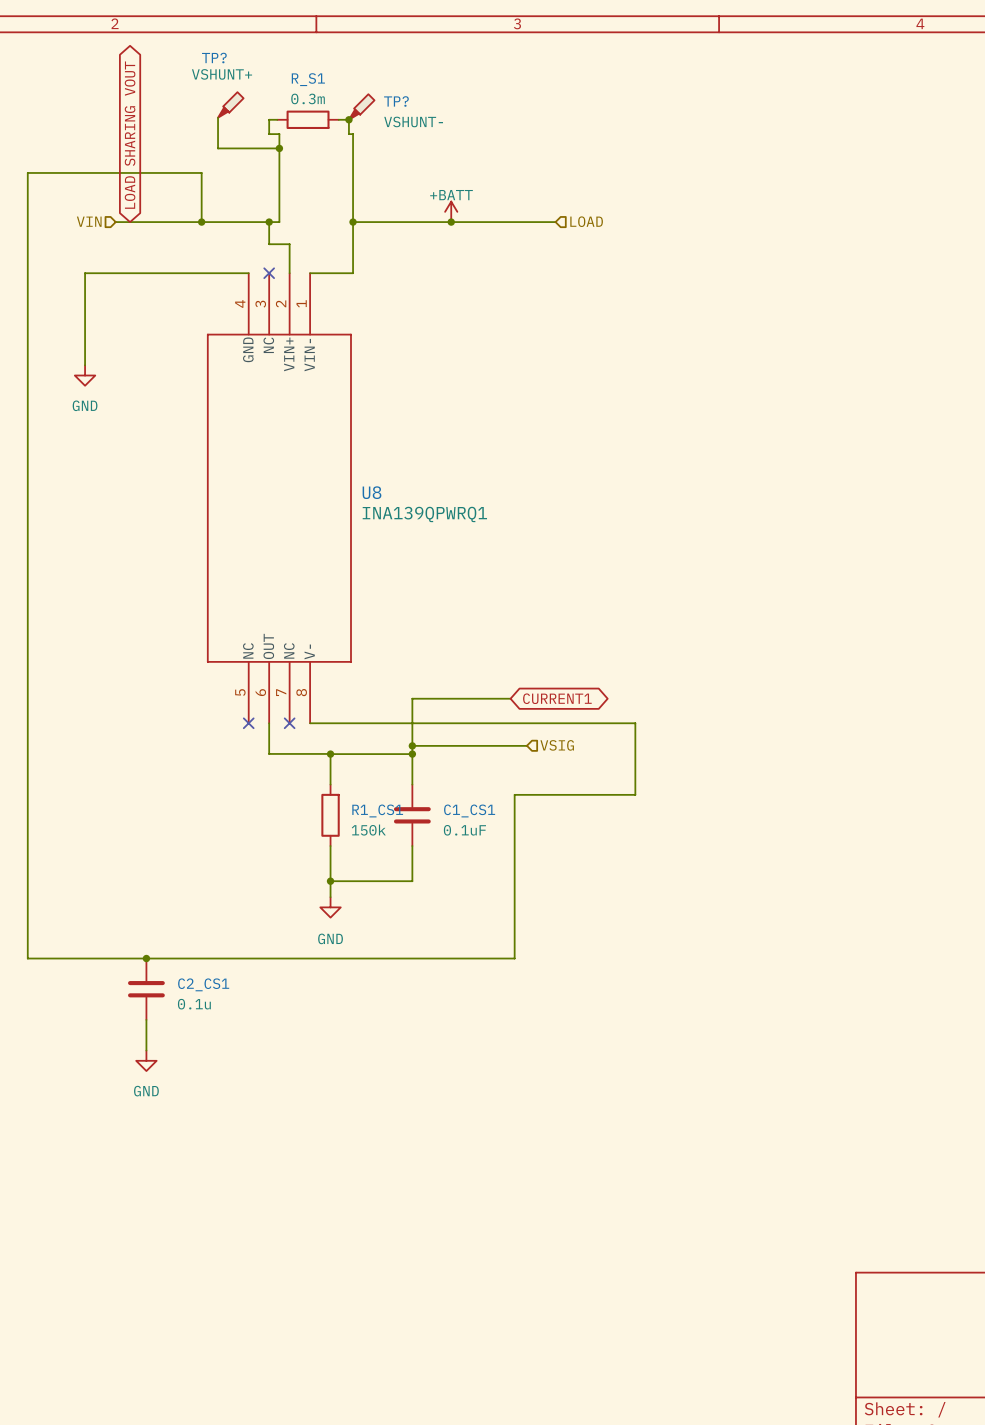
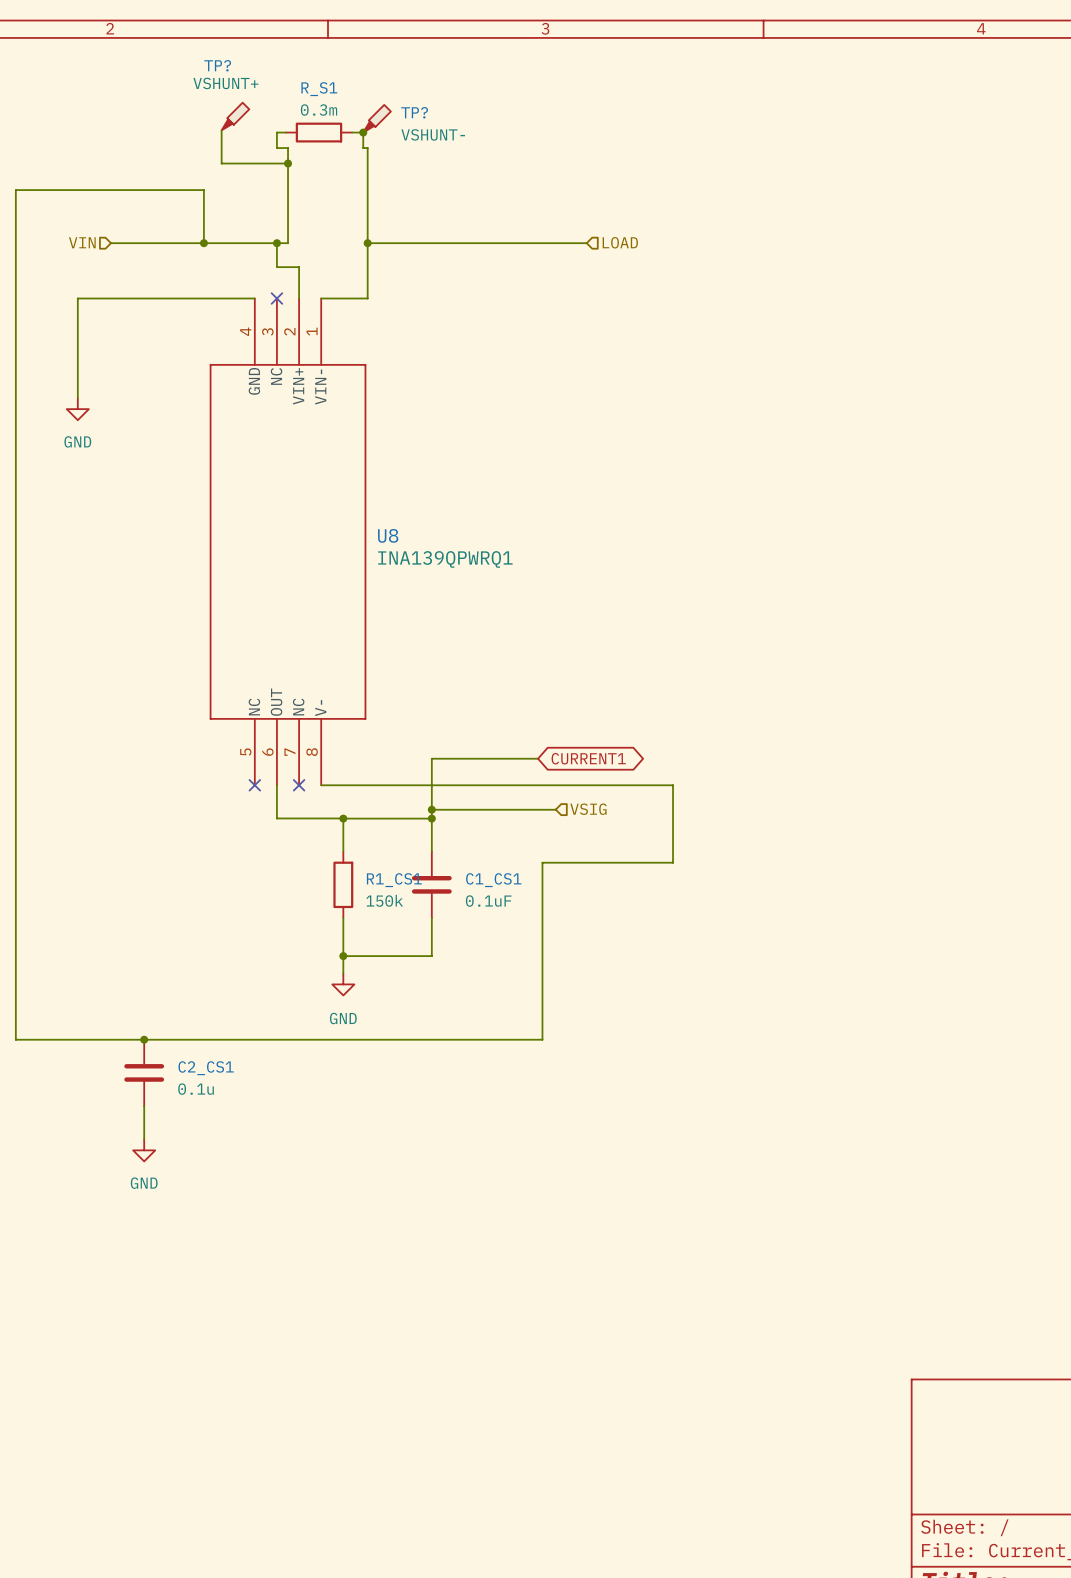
global label: LOAD SHARING VOUT (130, 135) -> none
power symbol: +BATT (451, 211) -> none
junction: (451, 222) -> none

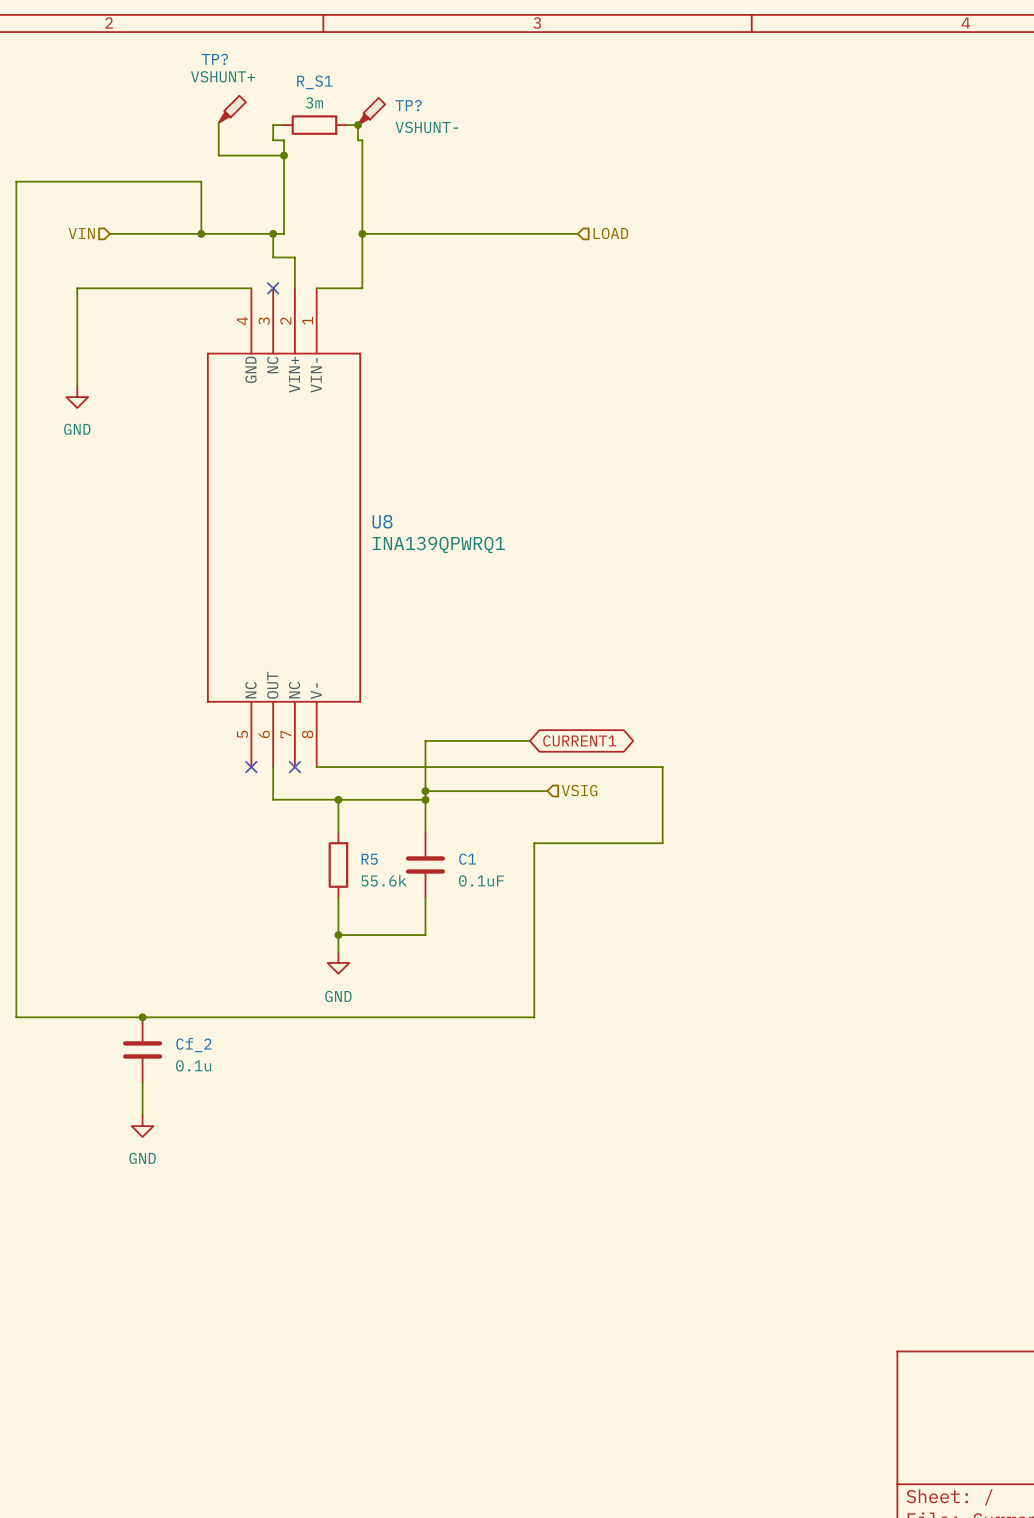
R_S1 value: 0.3m (319, 110) -> 3m (314, 102)
R1_CS1 name: R1_CS1 (394, 880) -> R5 (369, 859)
C1_CS1 name: C1_CS1 (493, 880) -> C1 (467, 859)
R1_CS1 value: 150k (384, 900) -> 55.6k (383, 880)
C2_CS1 name: C2_CS1 (206, 1068) -> Cf_2 (193, 1045)

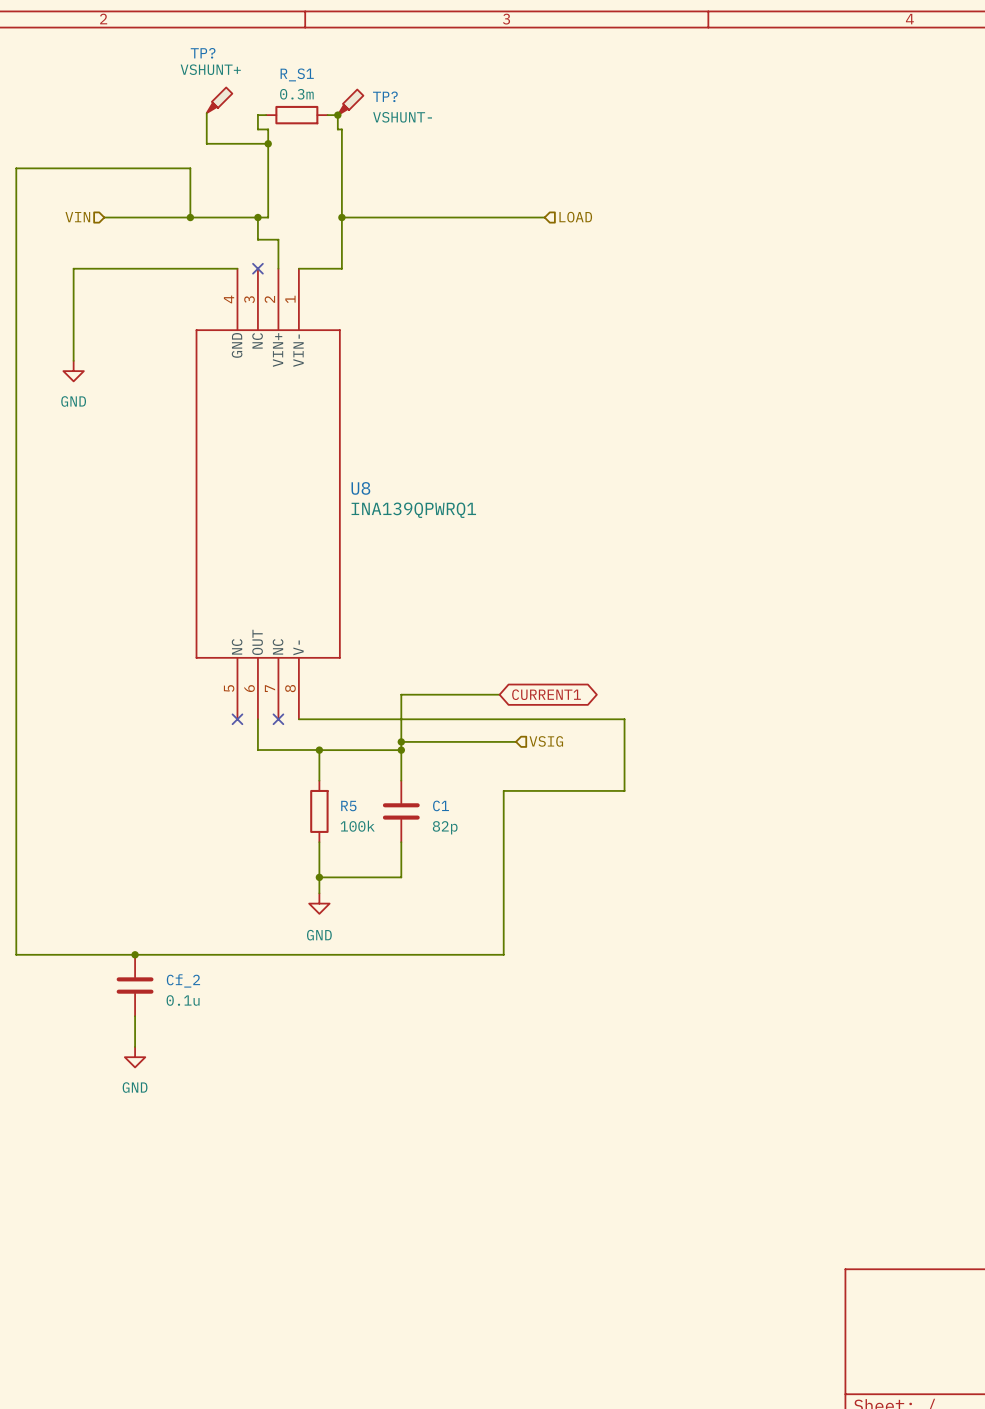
R_S1 value: 3m (314, 102) -> 0.3m (296, 94)
R5 value: 55.6k (383, 880) -> 100k (357, 826)
C1 value: 0.1uF (481, 880) -> 82p (445, 827)

